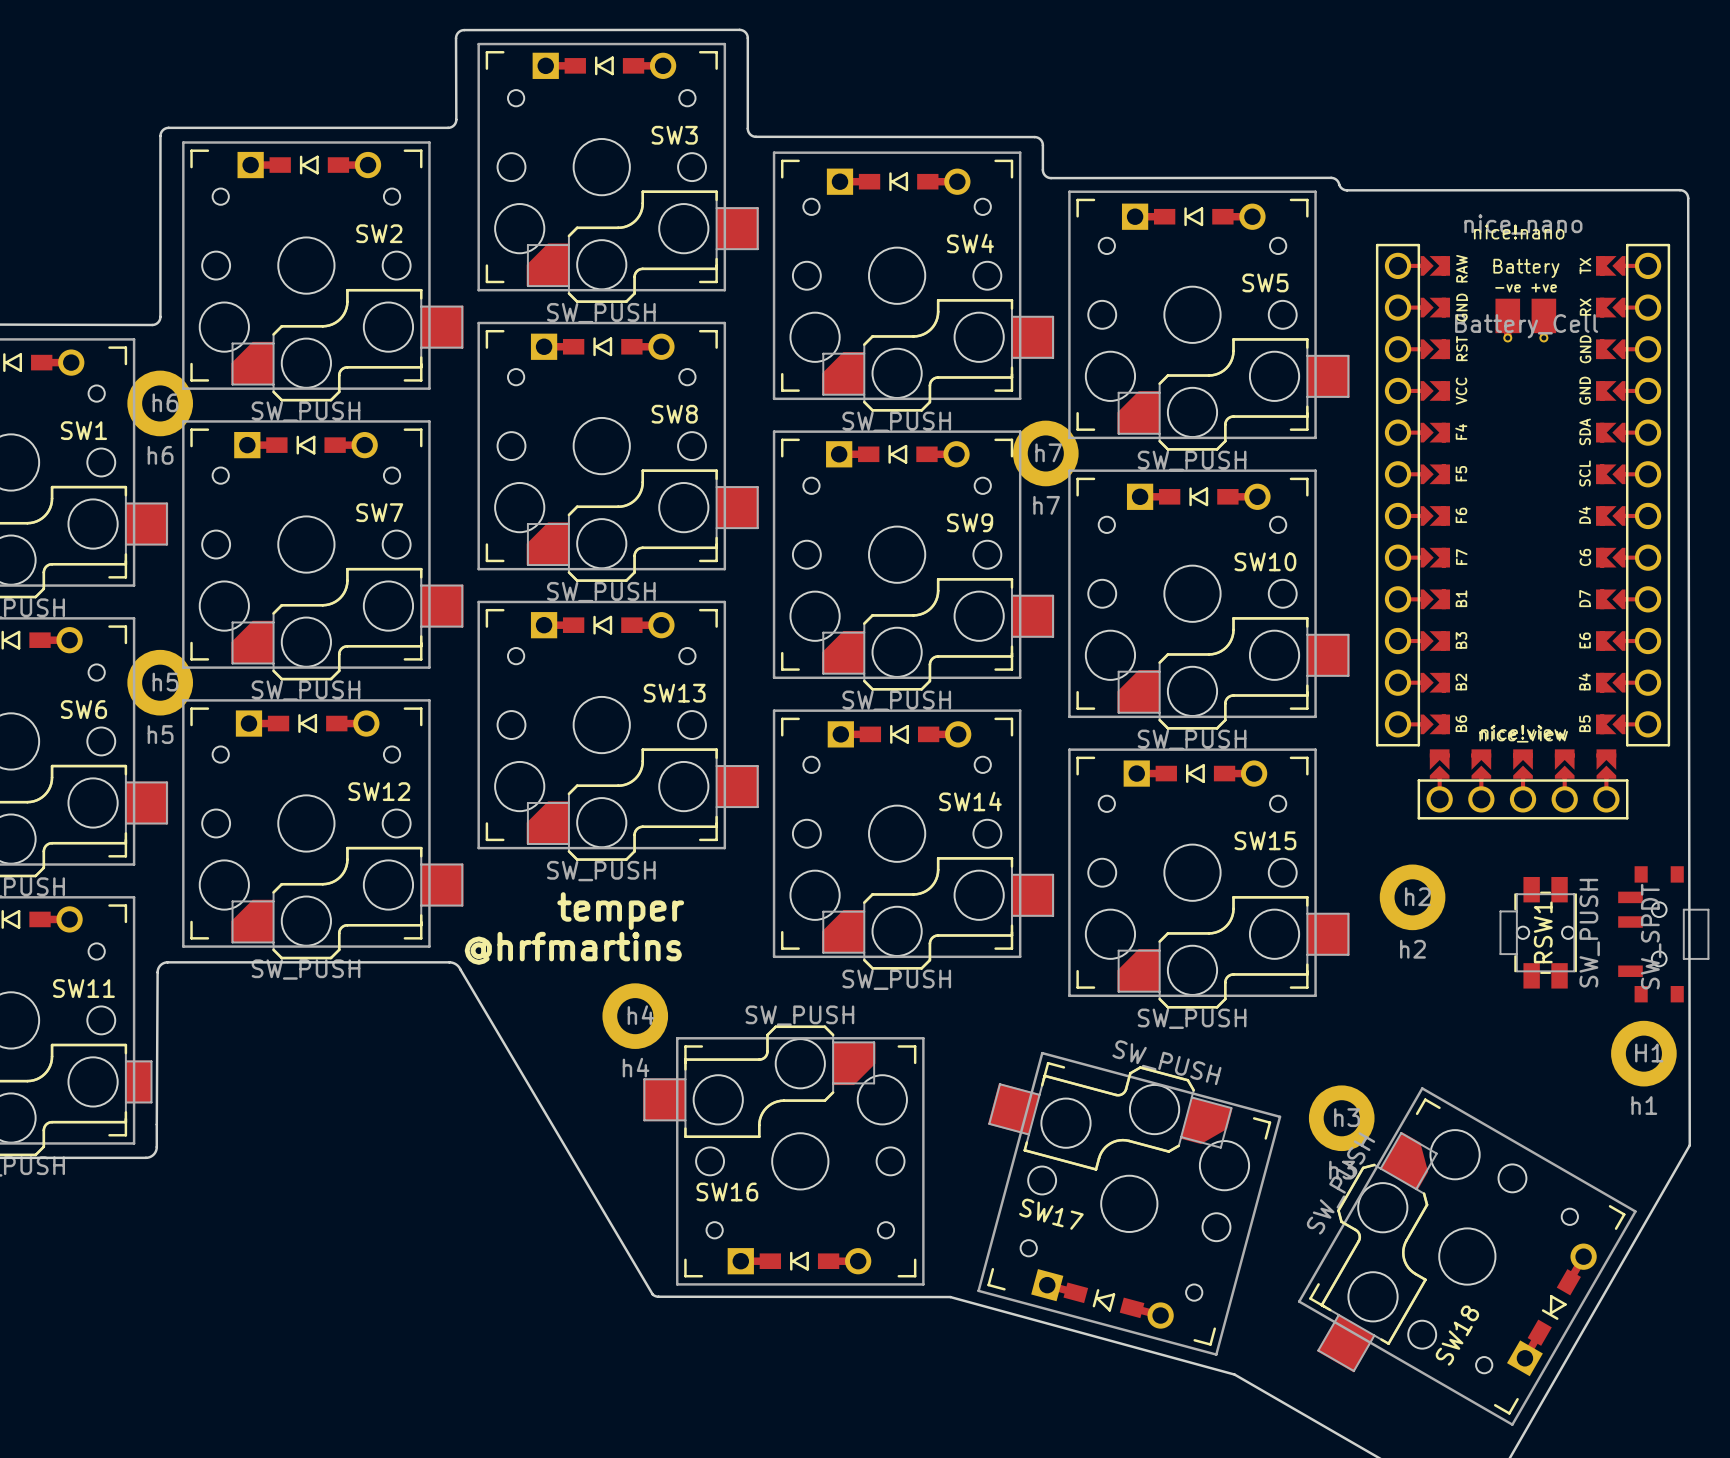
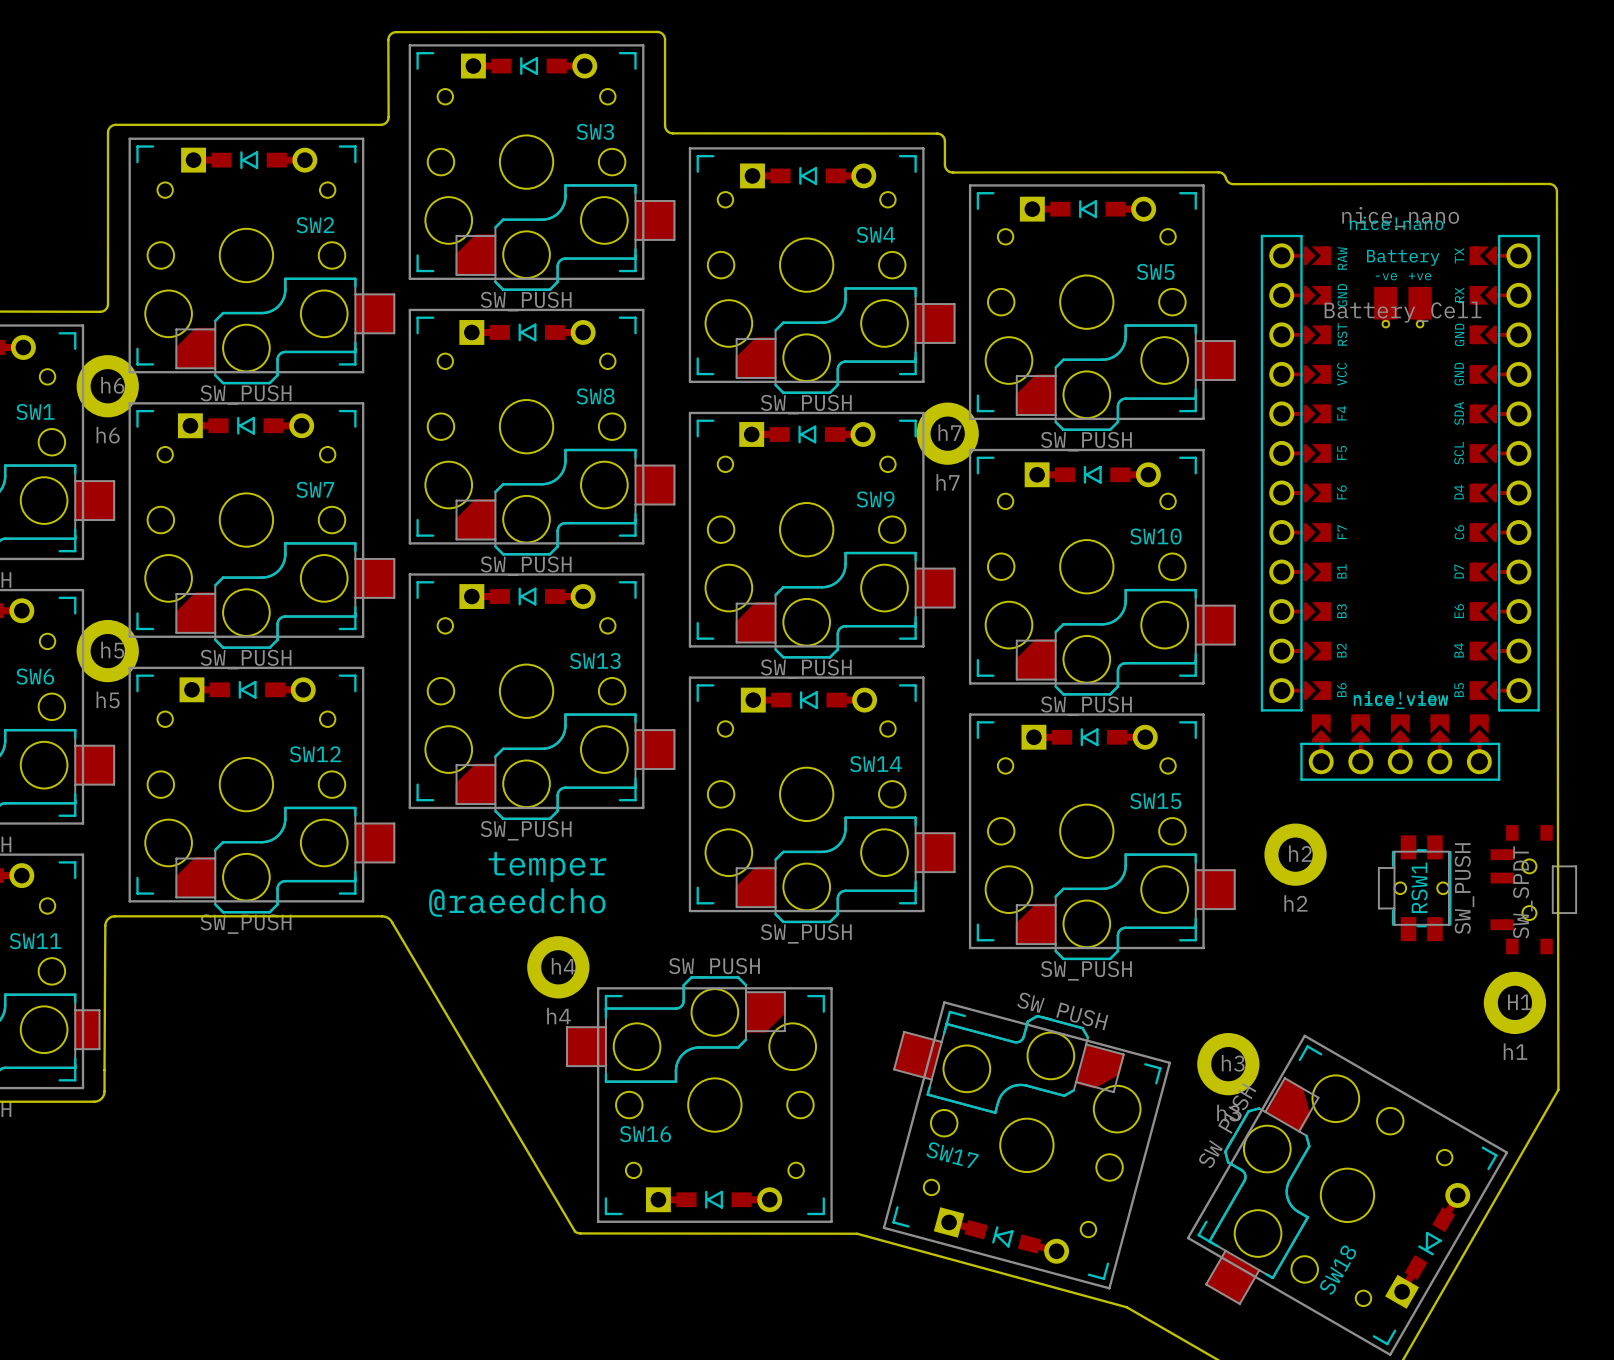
text: @hrfmartins (573, 948) -> @raeedcho (517, 902)

